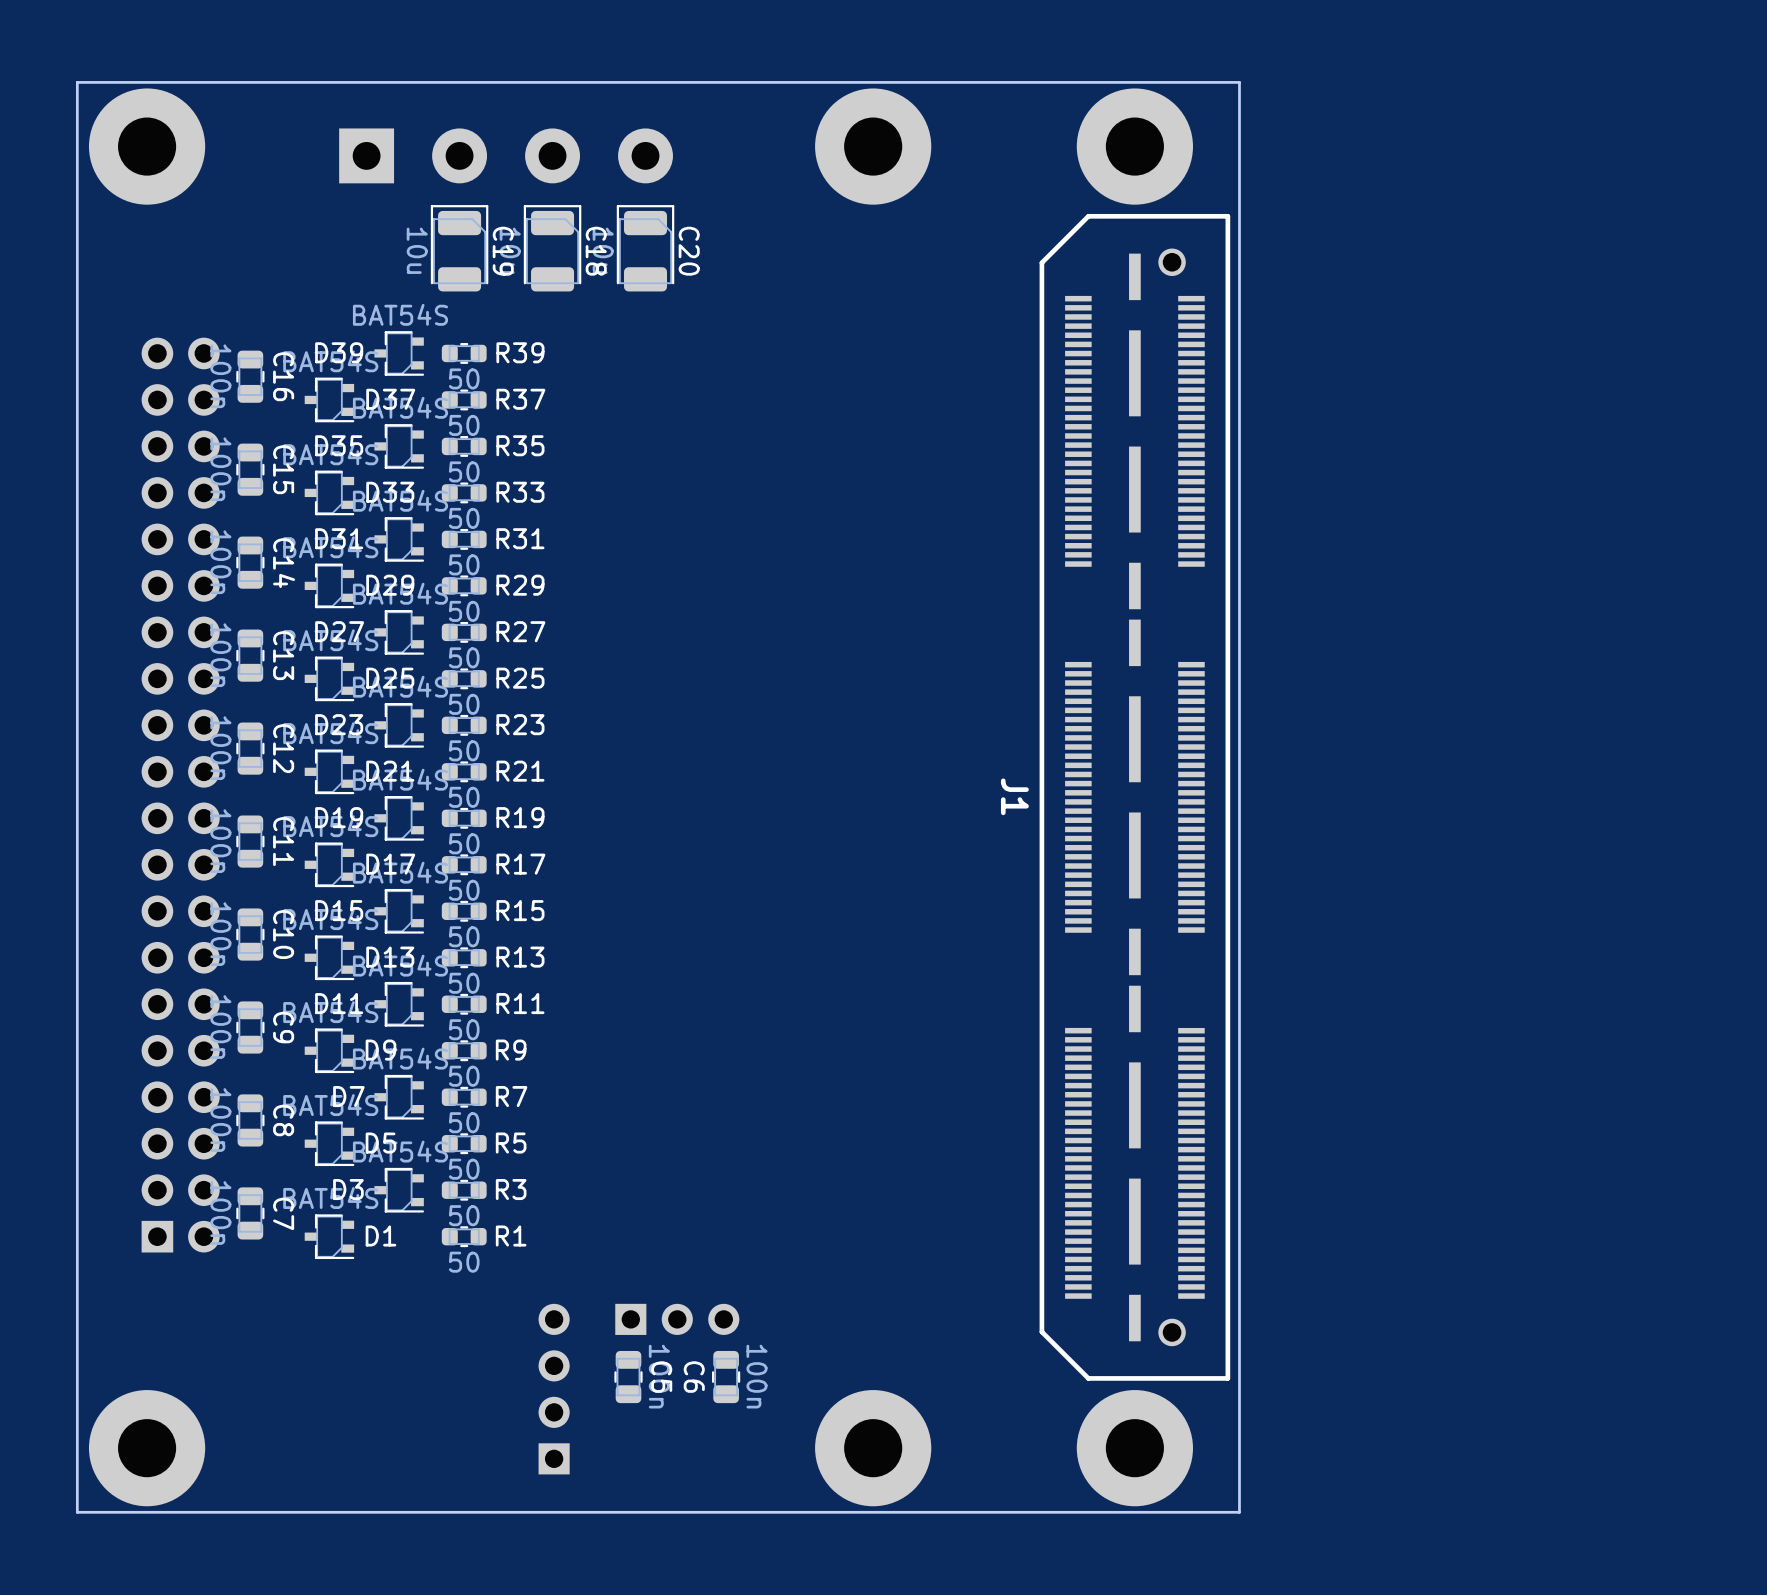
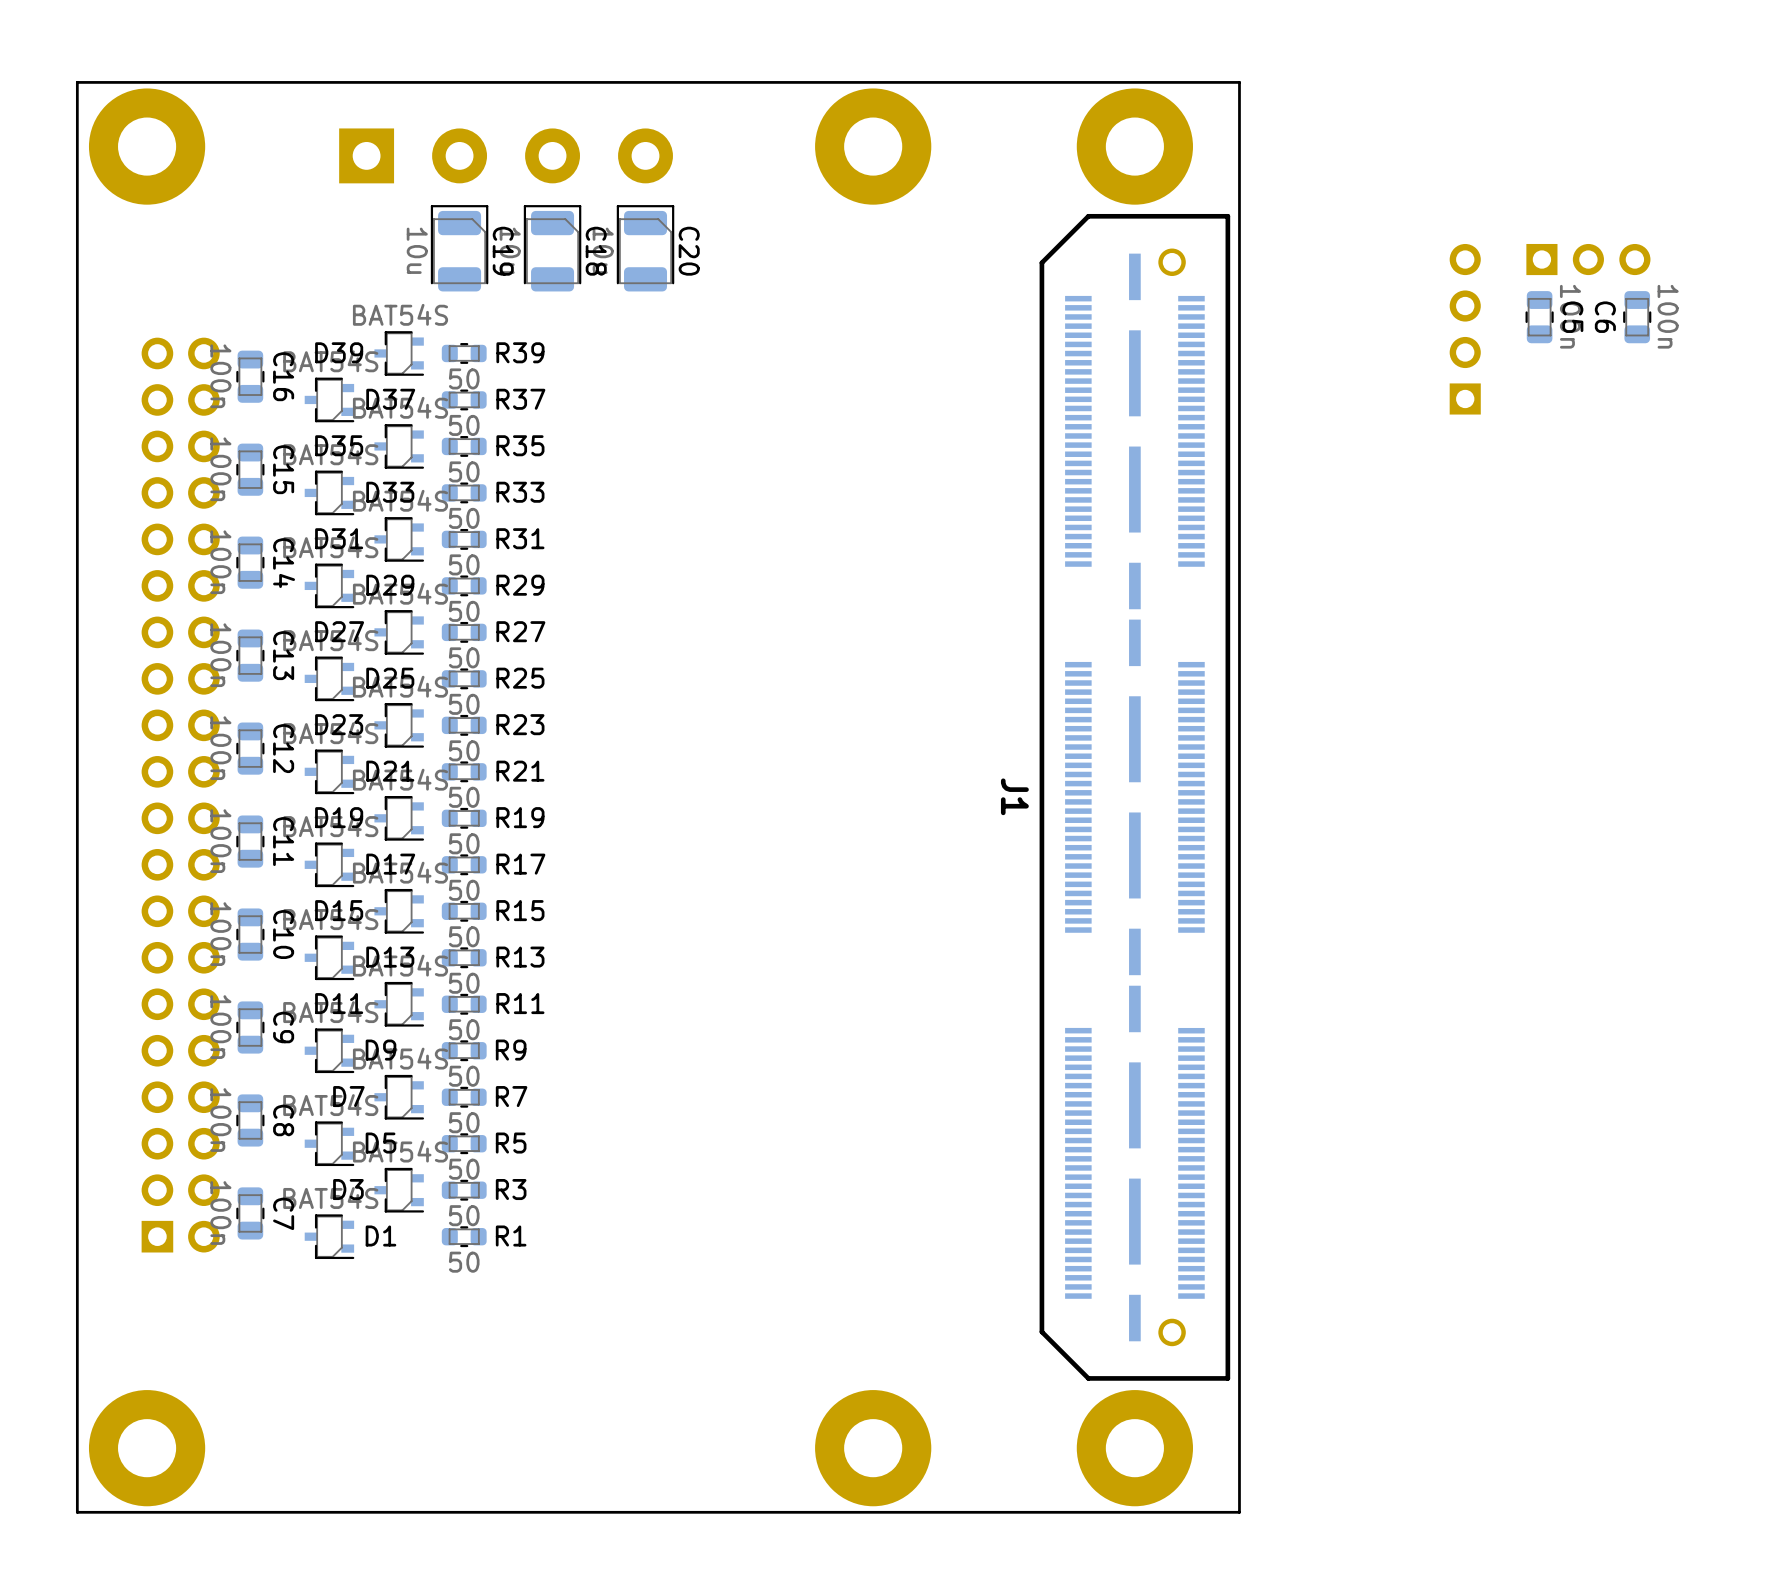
part: none -> (1588, 259)
part: none -> (1465, 329)
part: (677, 1319) -> none
C5 position: (628, 1377) -> (1539, 317)
C6 position: (726, 1377) -> (1637, 317)
part: (554, 1389) -> none

